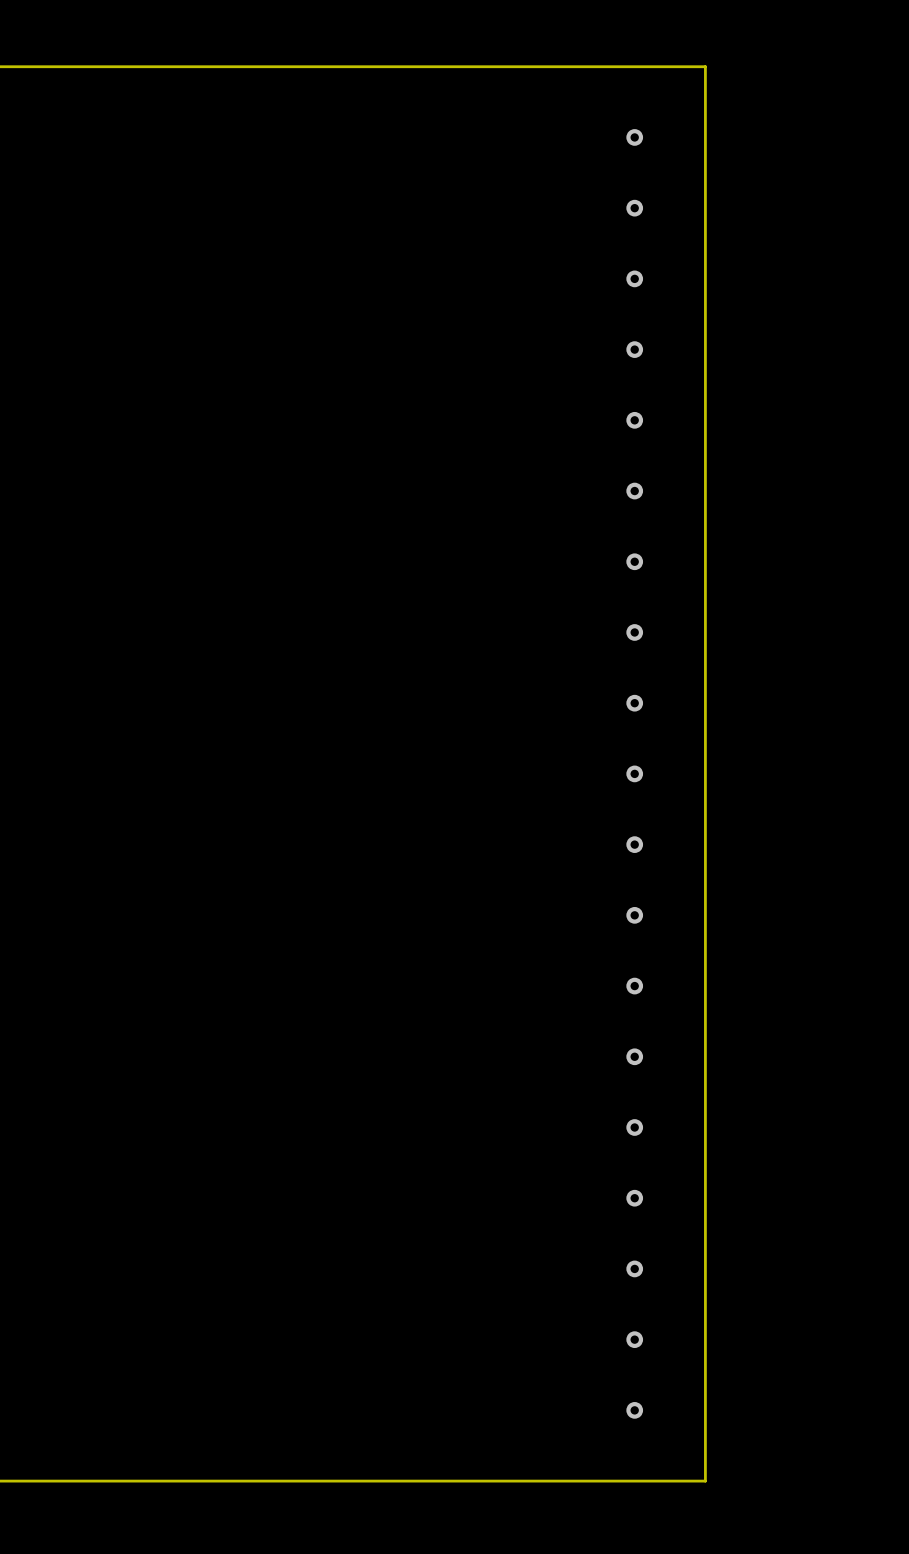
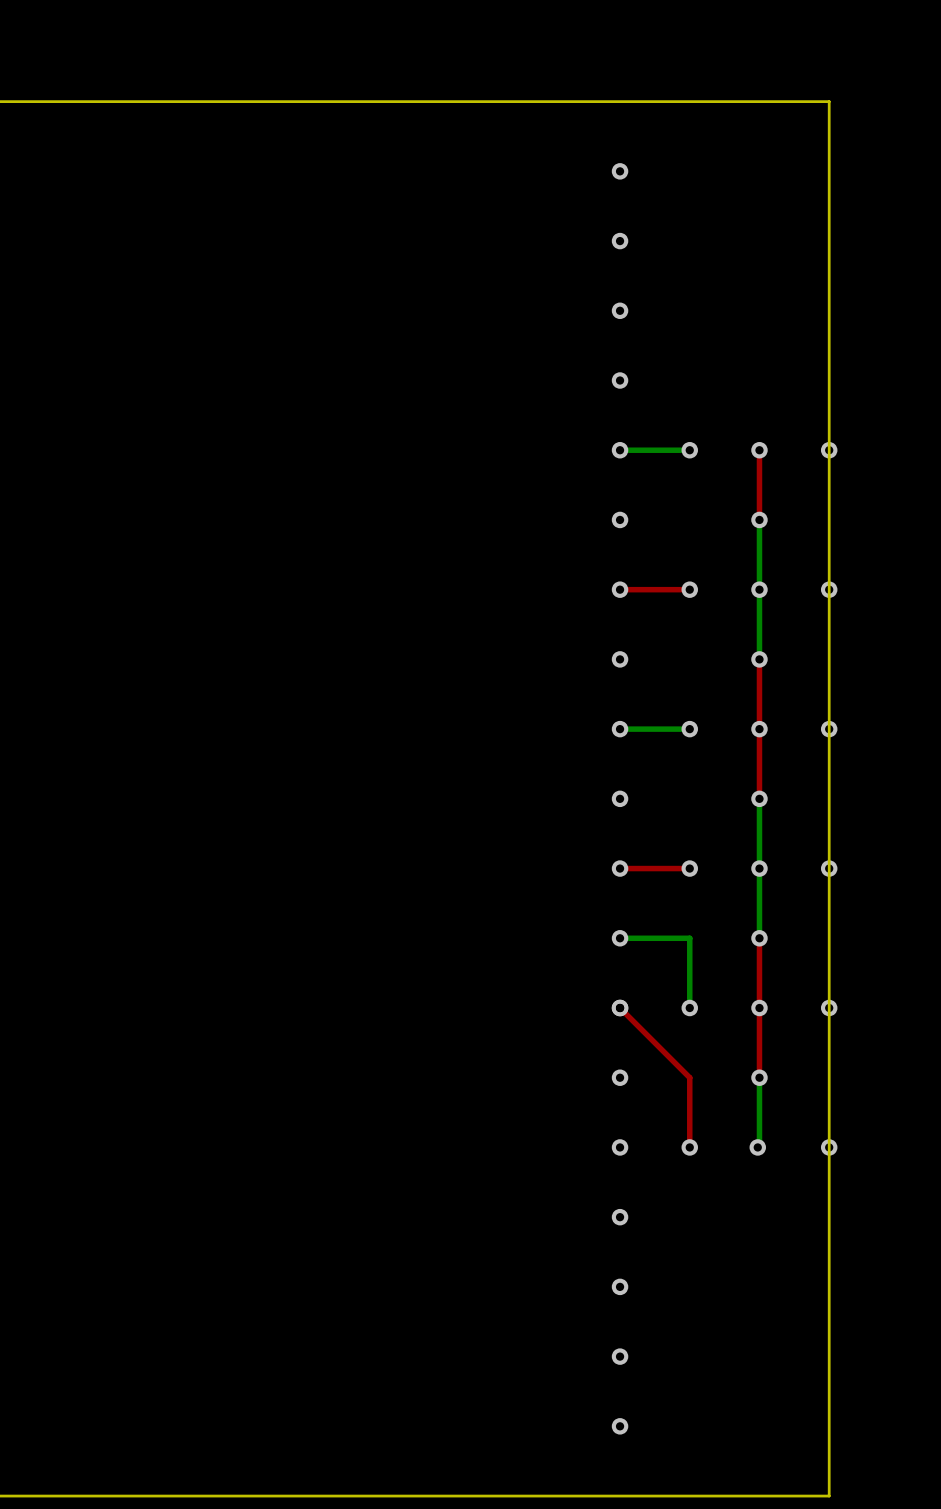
board edge: (705, 66) (705, 1481) -> (689, 101) (829, 101) (829, 1496) (689, 1496)
bottom track: none -> (620, 450) (689, 450)
via: none -> (689, 450)
top track: none -> (759, 450) (759, 519)
via: none -> (759, 450)
via: none -> (829, 450)
bottom track: none -> (759, 519) (759, 659)
via: none -> (759, 519)
top track: none -> (620, 589) (689, 589)
via: none -> (689, 589)
via: none -> (759, 589)
via: none -> (829, 589)
top track: none -> (759, 659) (759, 798)
via: none -> (759, 659)
bottom track: none -> (620, 729) (689, 729)
via: none -> (689, 729)
via: none -> (759, 729)
via: none -> (829, 729)
bottom track: none -> (759, 798) (759, 938)
via: none -> (759, 798)
top track: none -> (620, 868) (689, 868)
via: none -> (689, 868)
via: none -> (759, 868)
via: none -> (829, 868)
bottom track: none -> (620, 938) (689, 938) (689, 1008)
top track: none -> (759, 938) (759, 1077)
via: none -> (759, 938)
top track: none -> (620, 1008) (689, 1077) (689, 1147) (693, 1143)
via: none -> (689, 1008)
via: none -> (759, 1008)
via: none -> (829, 1008)
bottom track: none -> (759, 1077) (759, 1145) (757, 1147)
via: none -> (759, 1077)
via: none -> (689, 1147)
via: none -> (757, 1147)
via: none -> (829, 1147)

